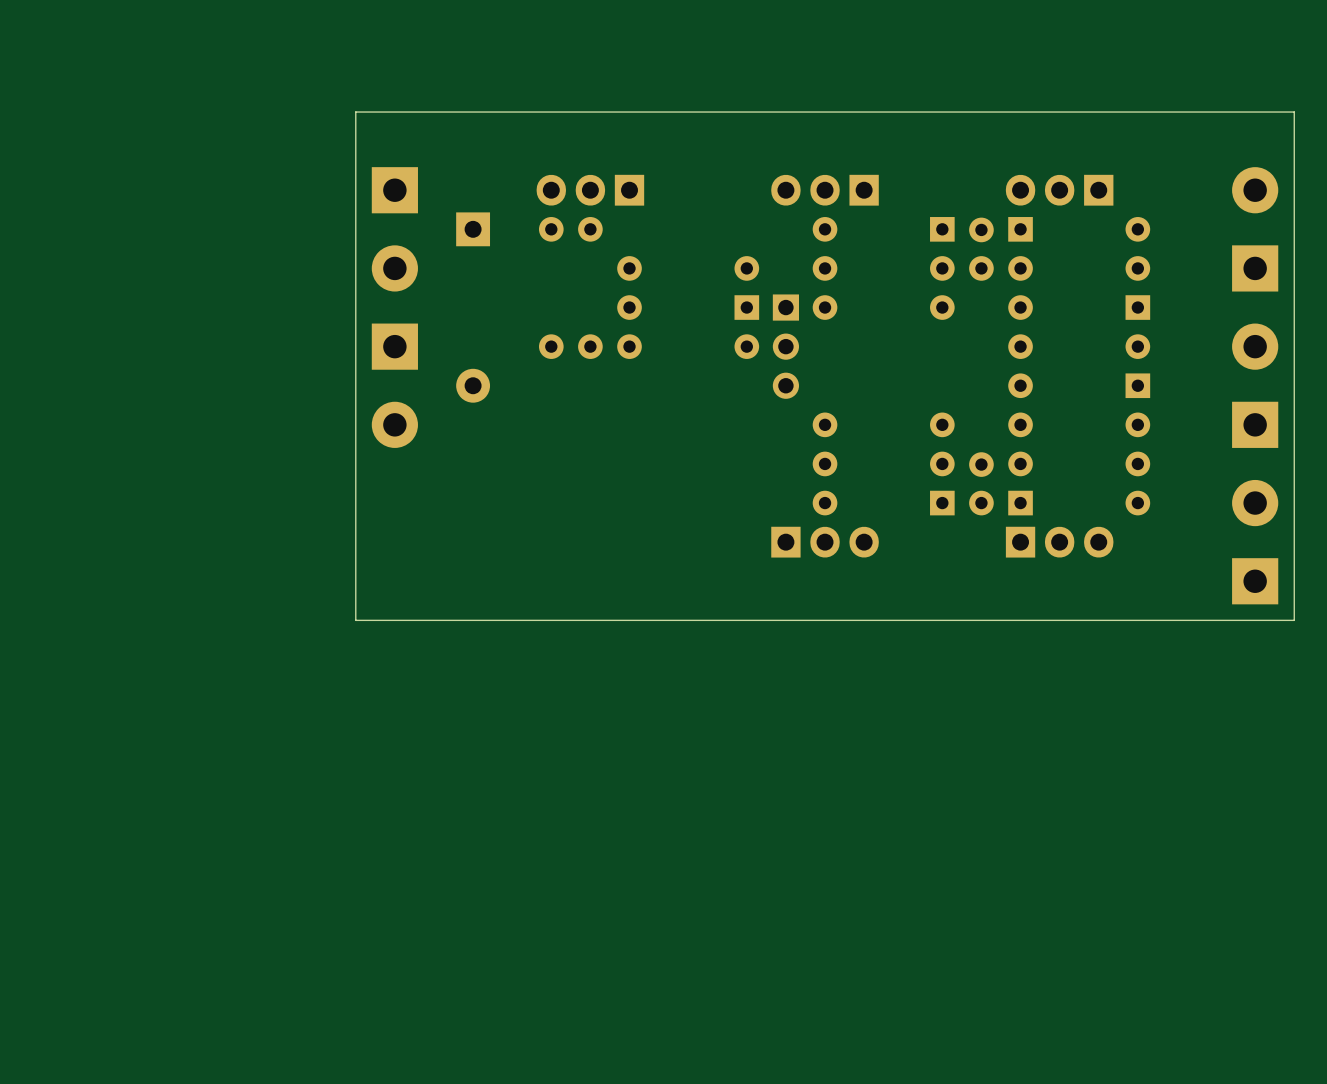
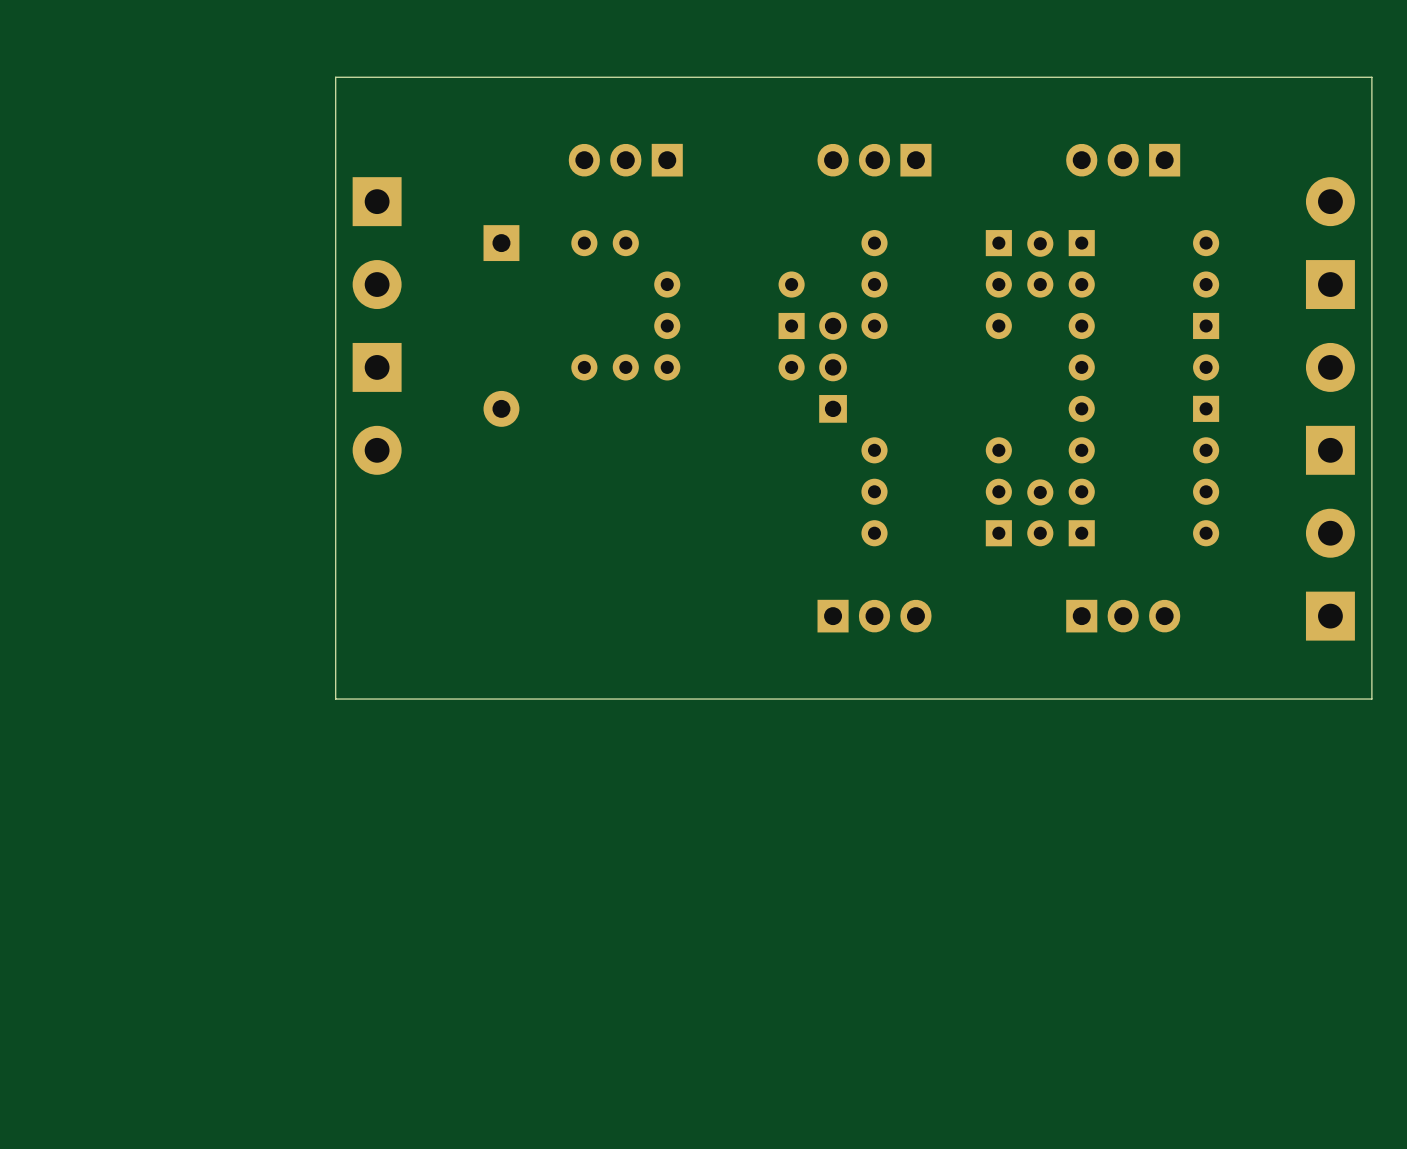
board edge: (1294, 112) (355, 112) (355, 620) (1294, 620) -> (1371, 118) (1371, 77) (335, 77) (335, 699) (1371, 699) (1371, 657)
part position: (590, 190) -> (625, 160)
part position: (825, 190) -> (874, 160)
part position: (1059, 190) -> (1123, 160)
part position: (394, 229) -> (377, 243)
part rotation: 0° (785, 346) -> 180° (833, 367)
part position: (394, 385) -> (377, 408)
part position: (825, 542) -> (874, 616)
part position: (1059, 542) -> (1123, 616)

